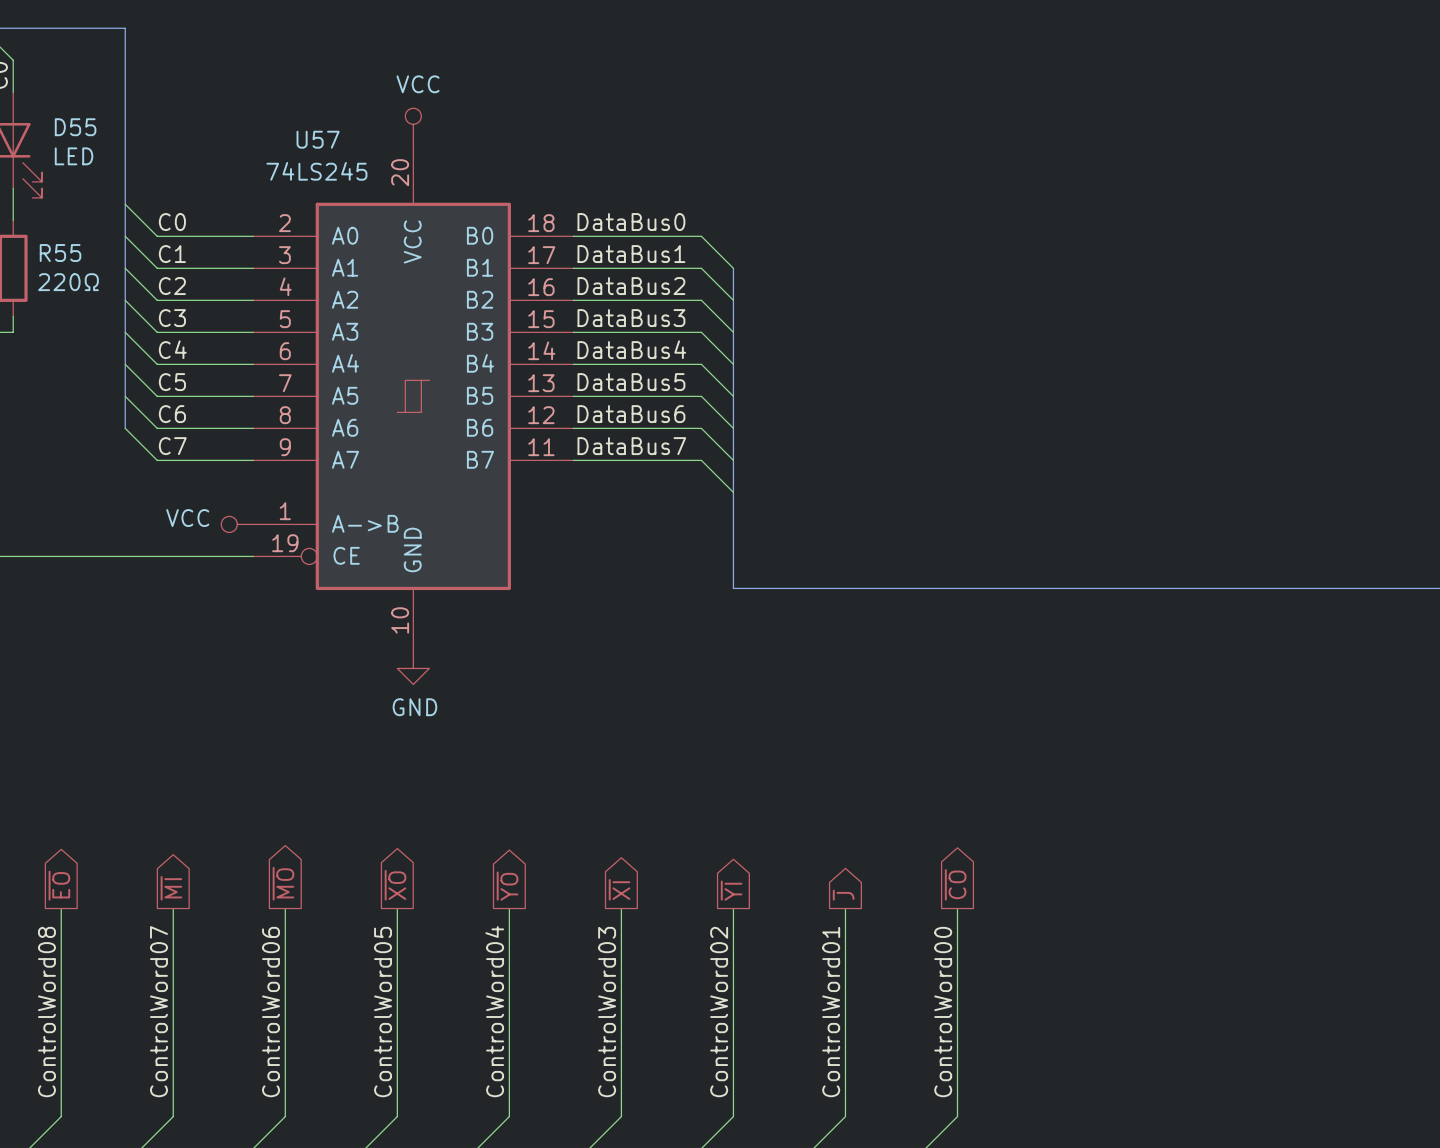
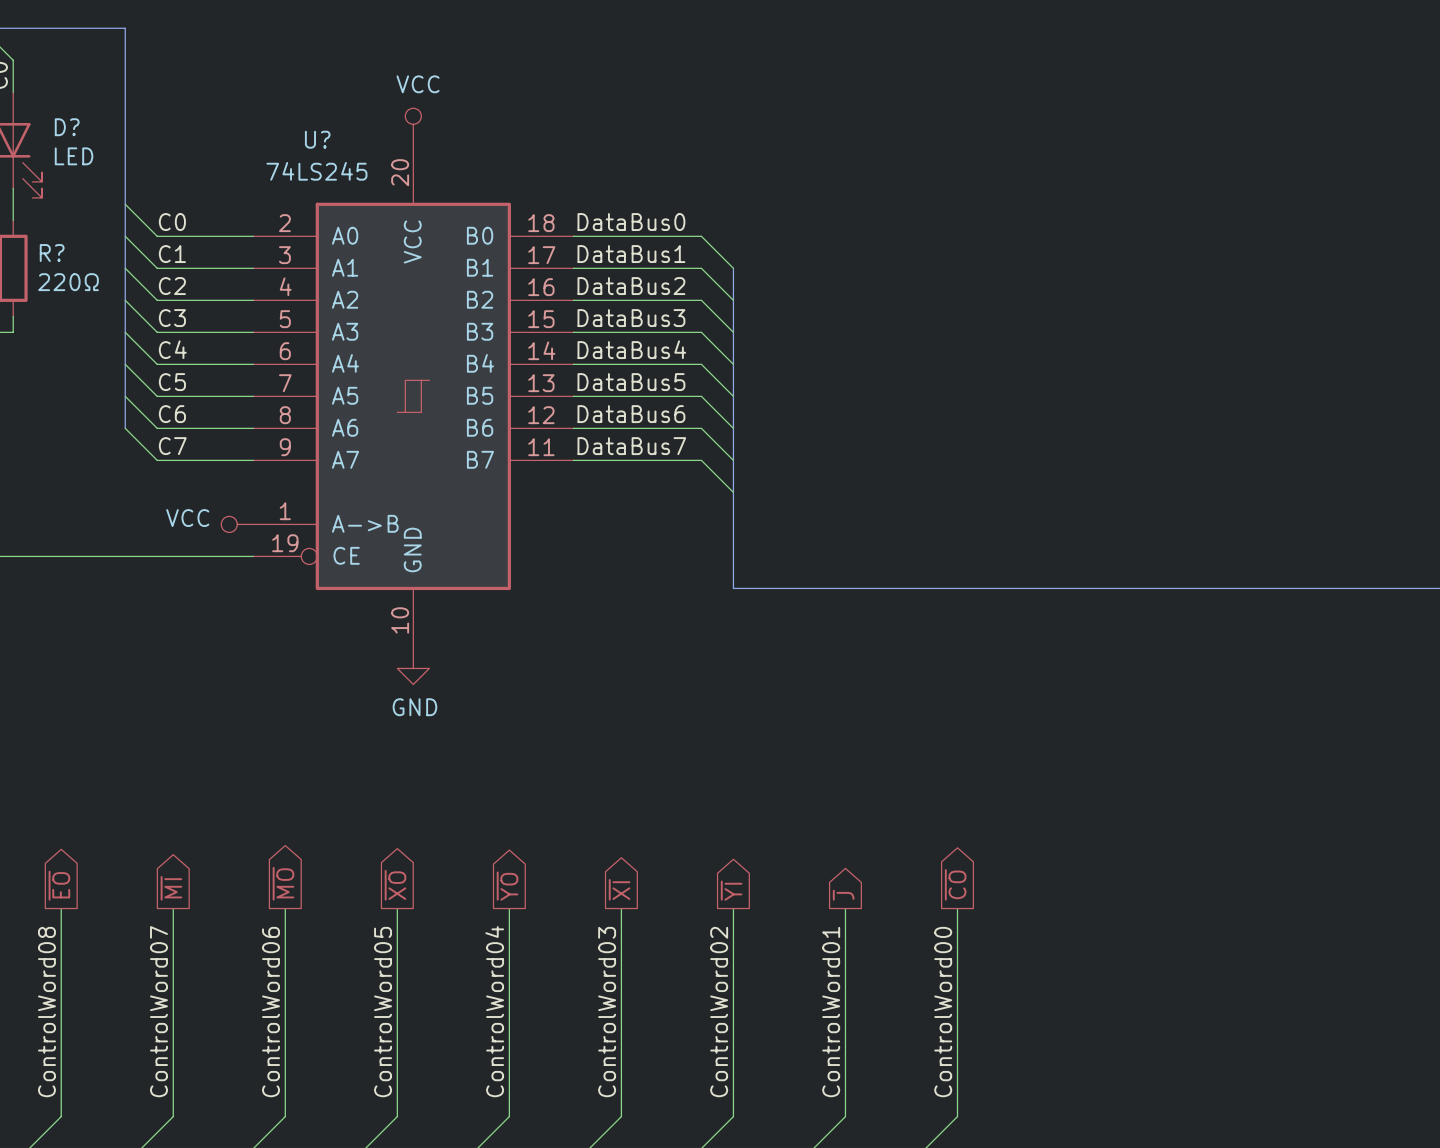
D55 name: D55 (75, 127) -> D? (67, 127)
U57 name: U57 (318, 139) -> U? (317, 139)
R55 name: R55 (60, 253) -> R? (52, 253)

